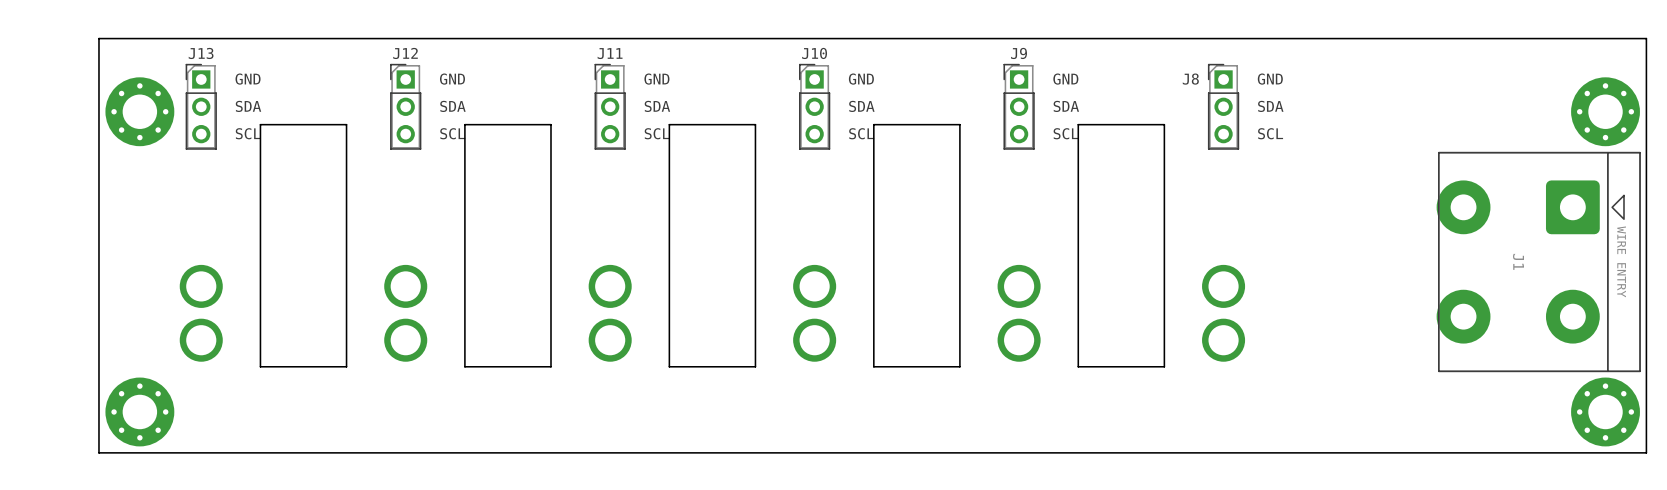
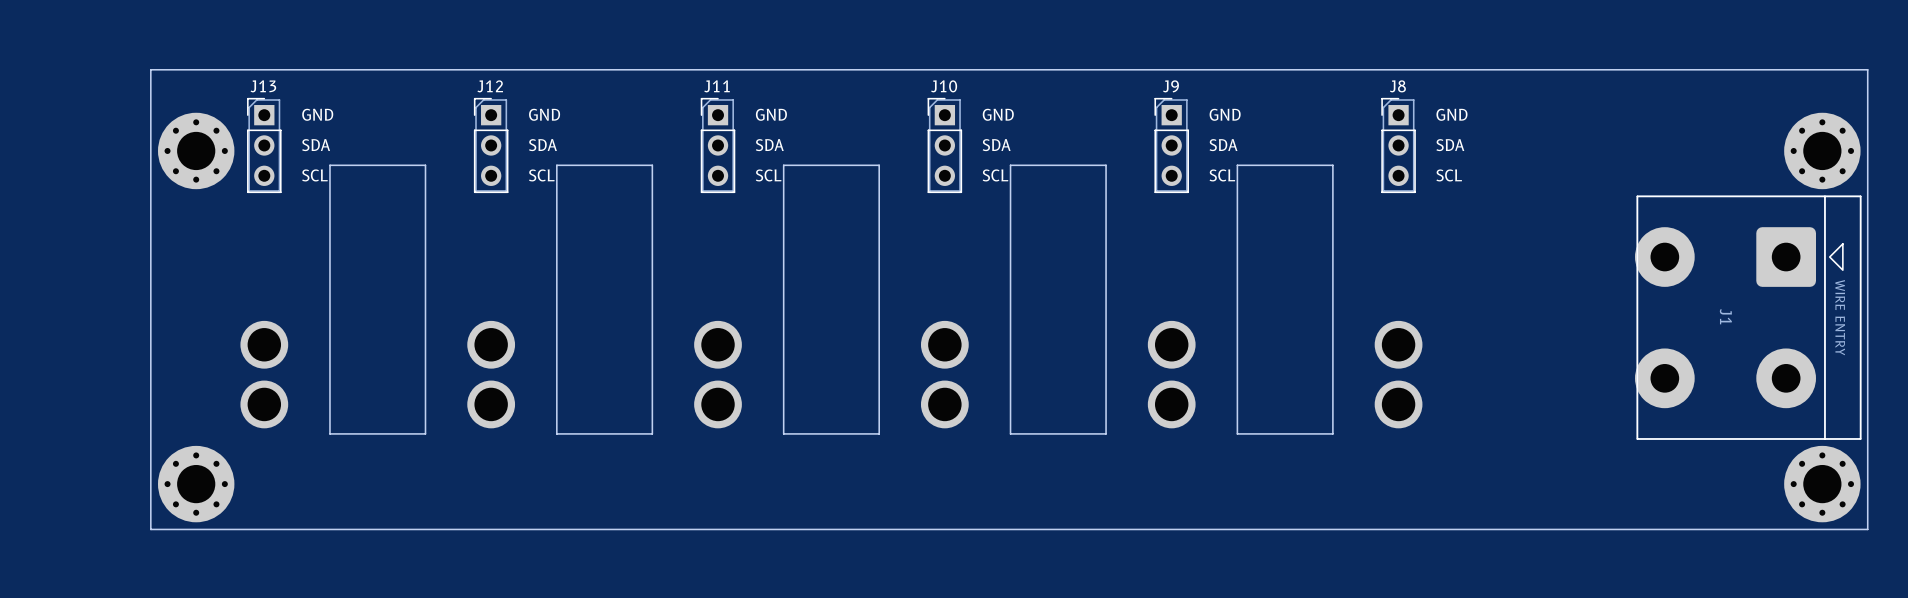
J8 name position: J8 (1190, 79) -> J8 (1397, 86)

